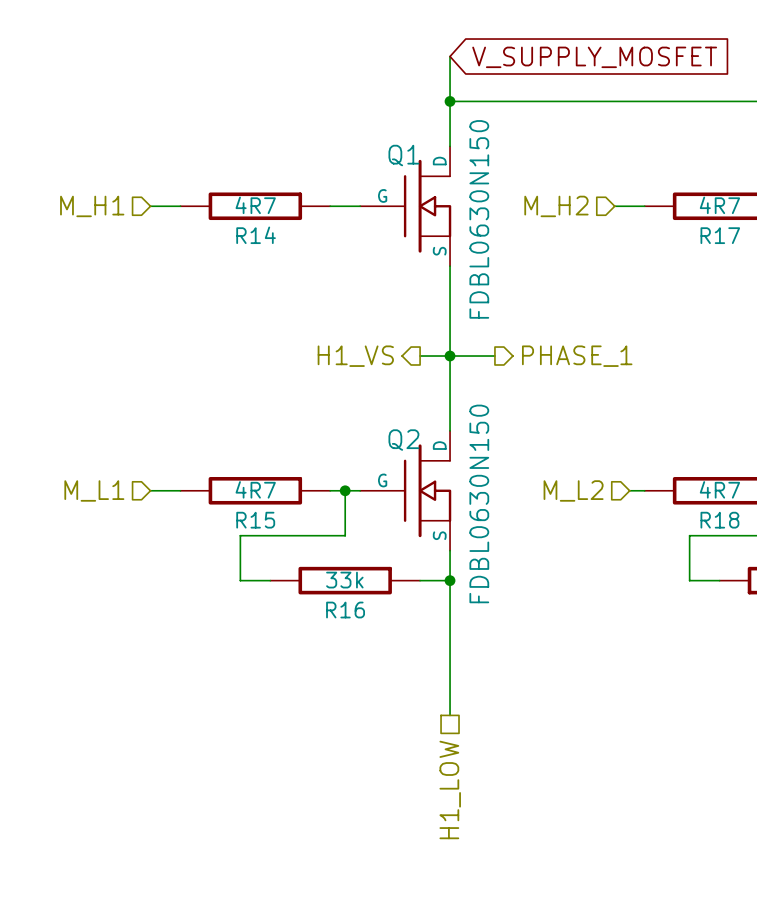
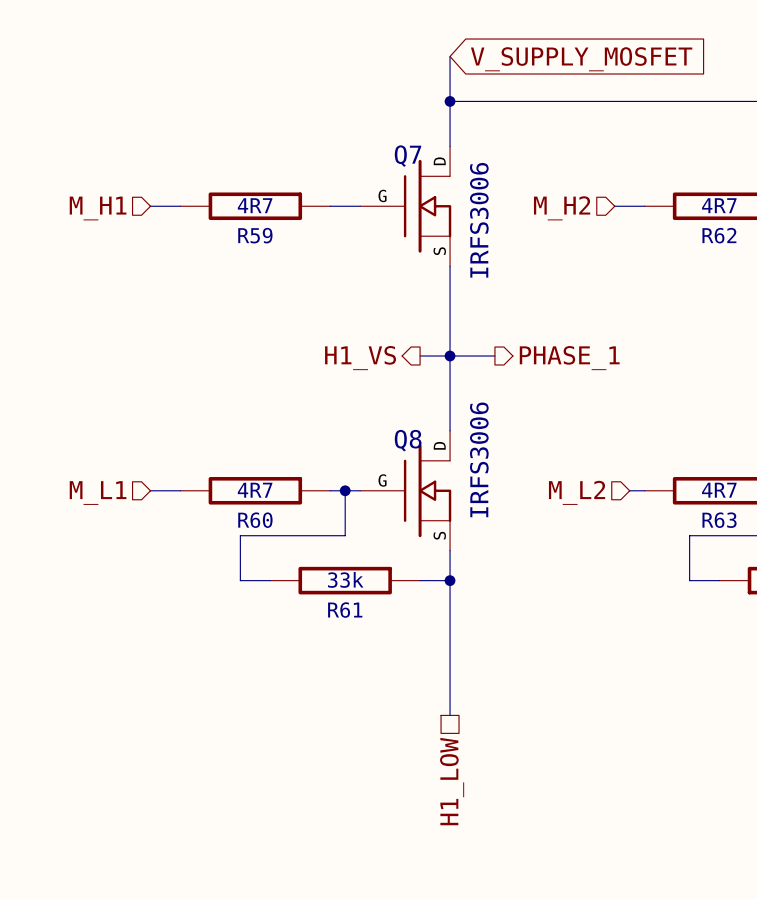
Q1 name: Q1 (403, 155) -> Q7 (408, 156)
Q1 value: FDBL0630N150 (479, 219) -> IRFS3006 (479, 220)
R14 name: R14 (256, 235) -> R59 (255, 235)
R17 name: R17 (720, 235) -> R62 (719, 235)
Q2 name: Q2 (403, 440) -> Q8 (408, 440)
Q2 value: FDBL0630N150 (479, 503) -> IRFS3006 (479, 459)
R15 name: R15 (255, 520) -> R60 (255, 520)
R18 name: R18 (719, 520) -> R63 (719, 520)
R16 name: R16 (345, 610) -> R61 (345, 610)

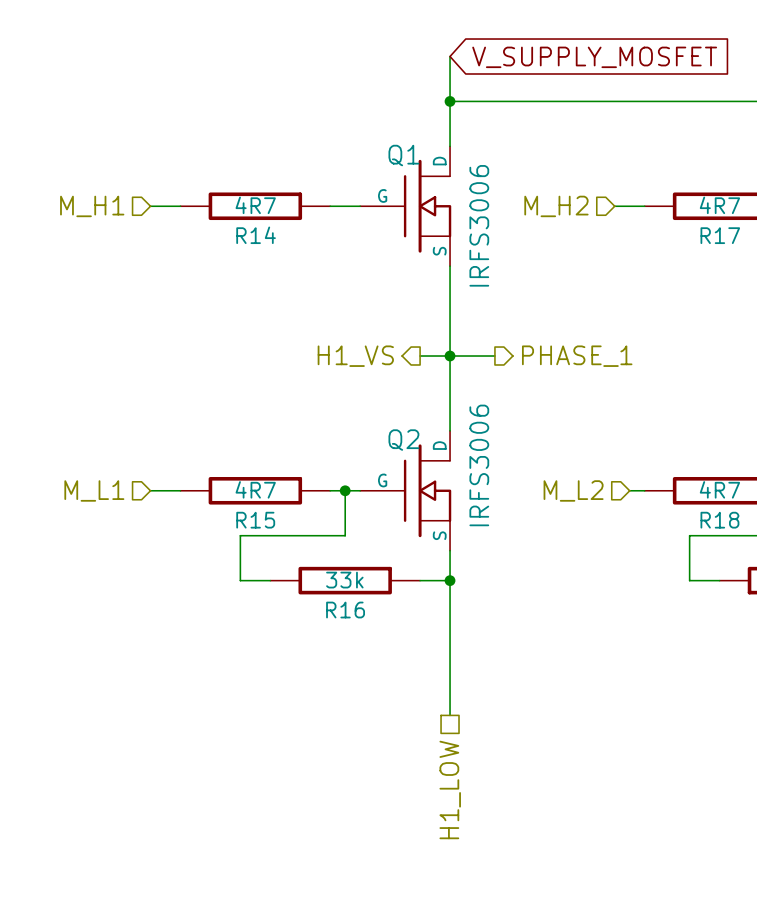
Q7 name: Q7 (408, 156) -> Q1 (403, 155)
R59 name: R59 (255, 235) -> R14 (256, 235)
R62 name: R62 (719, 235) -> R17 (720, 235)
Q8 name: Q8 (408, 440) -> Q2 (403, 440)
R60 name: R60 (255, 520) -> R15 (255, 520)
R63 name: R63 (719, 520) -> R18 (719, 520)
R61 name: R61 (345, 610) -> R16 (345, 610)

